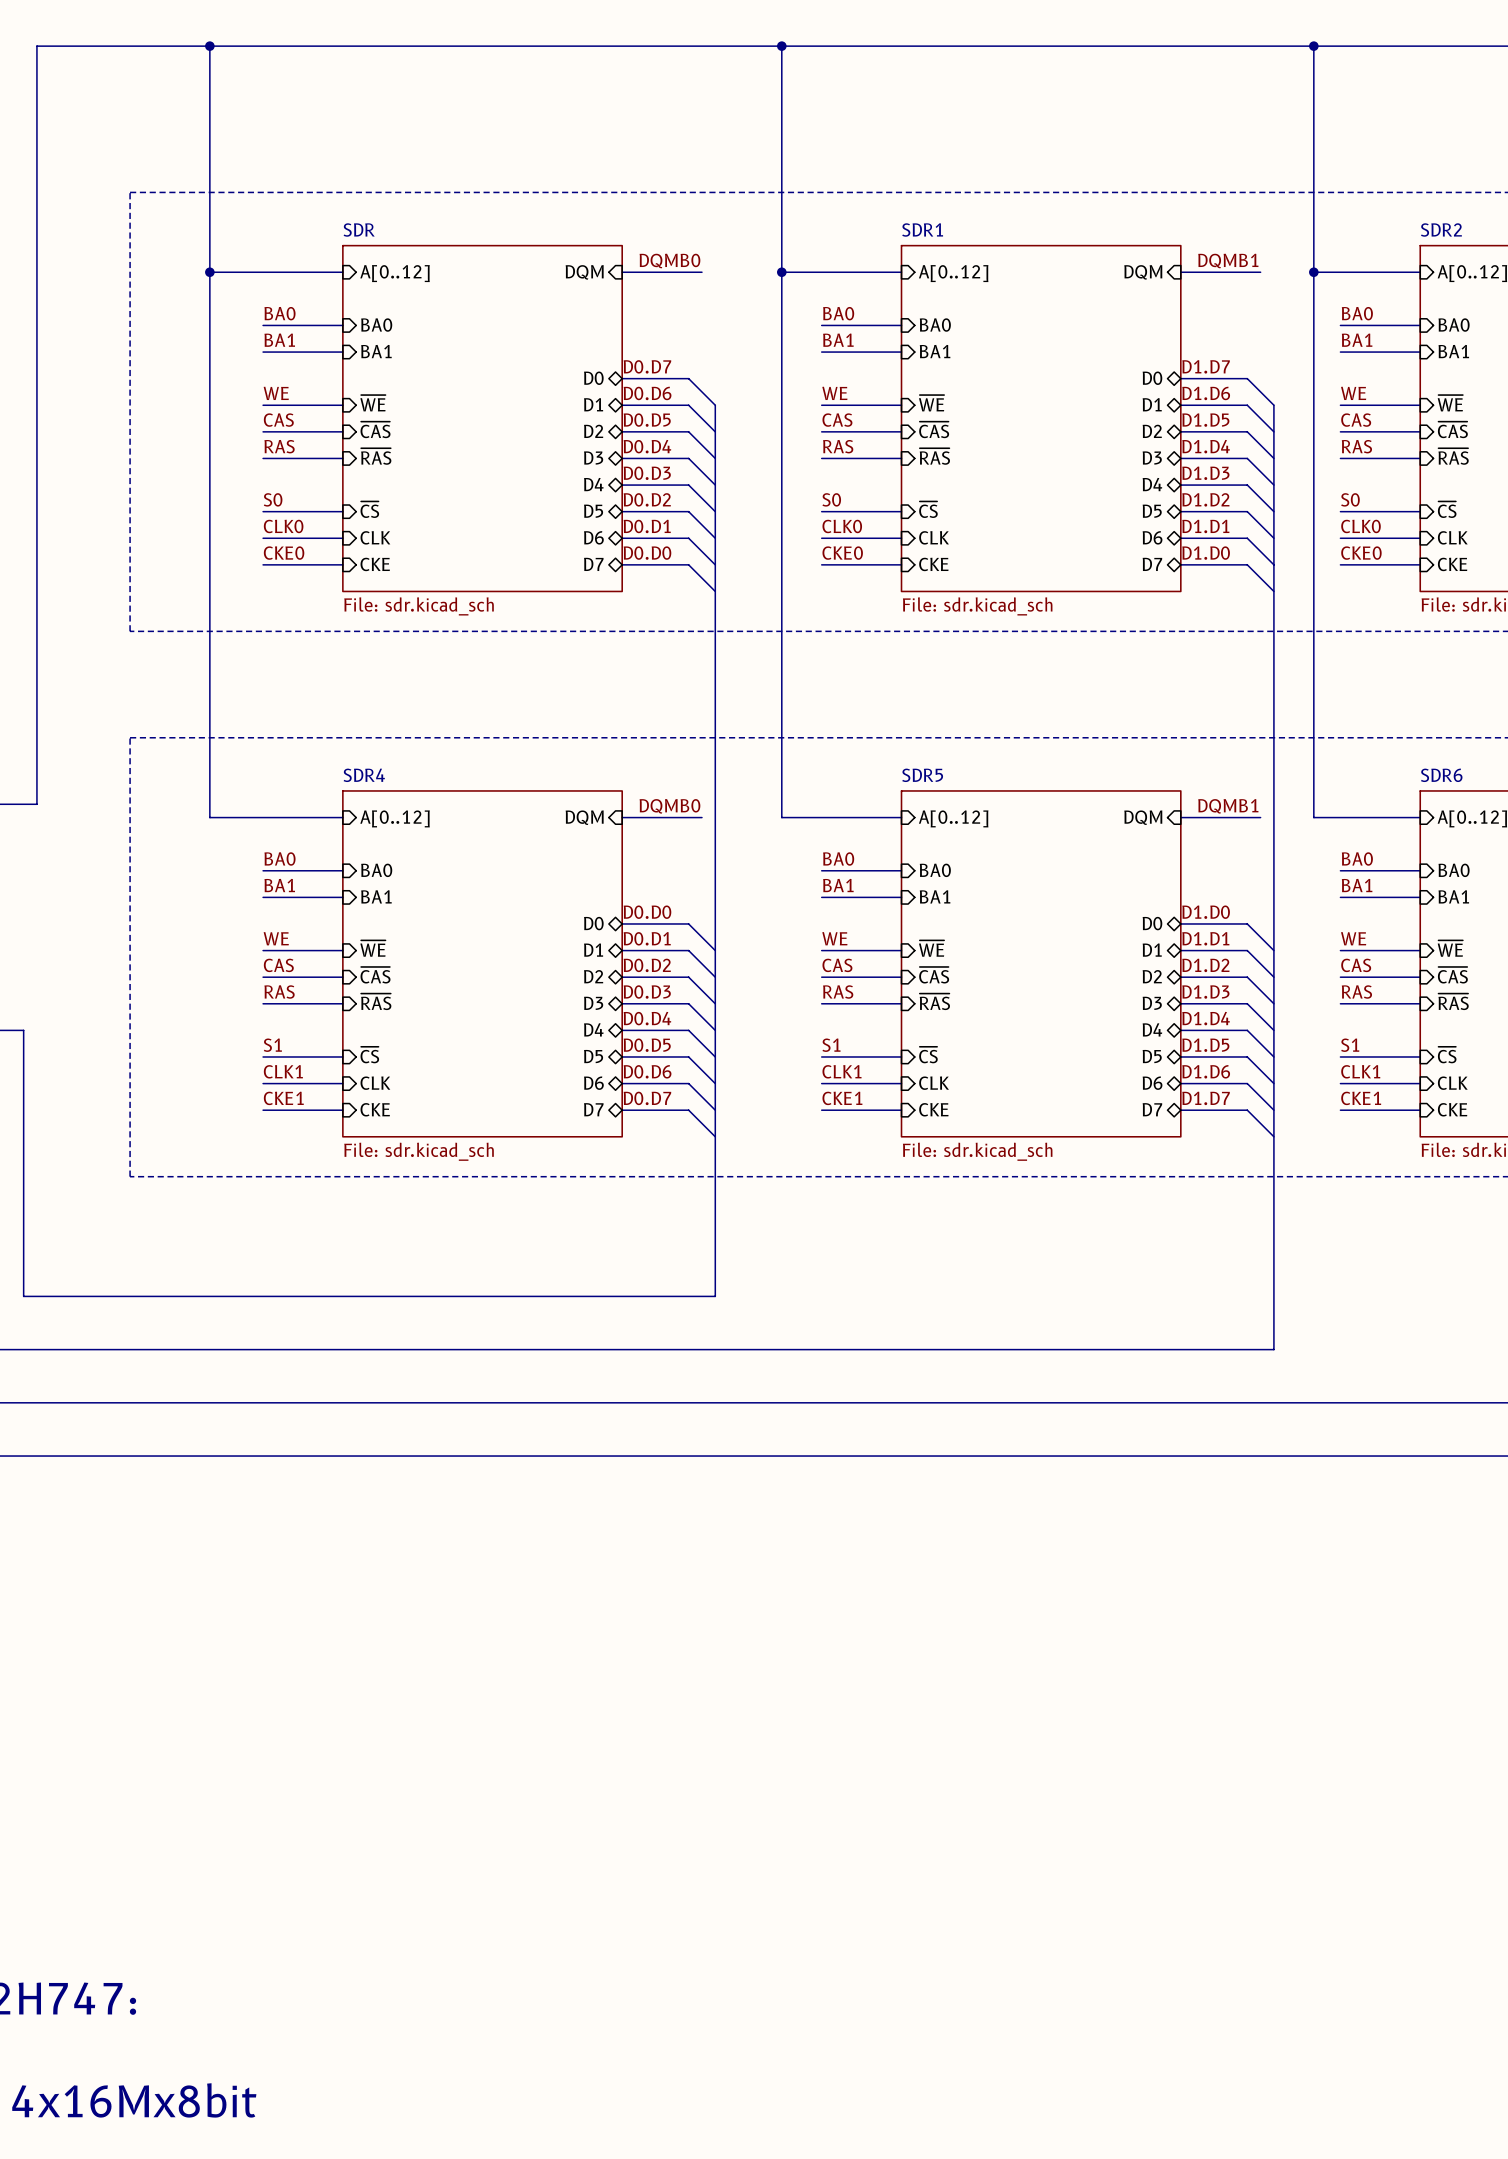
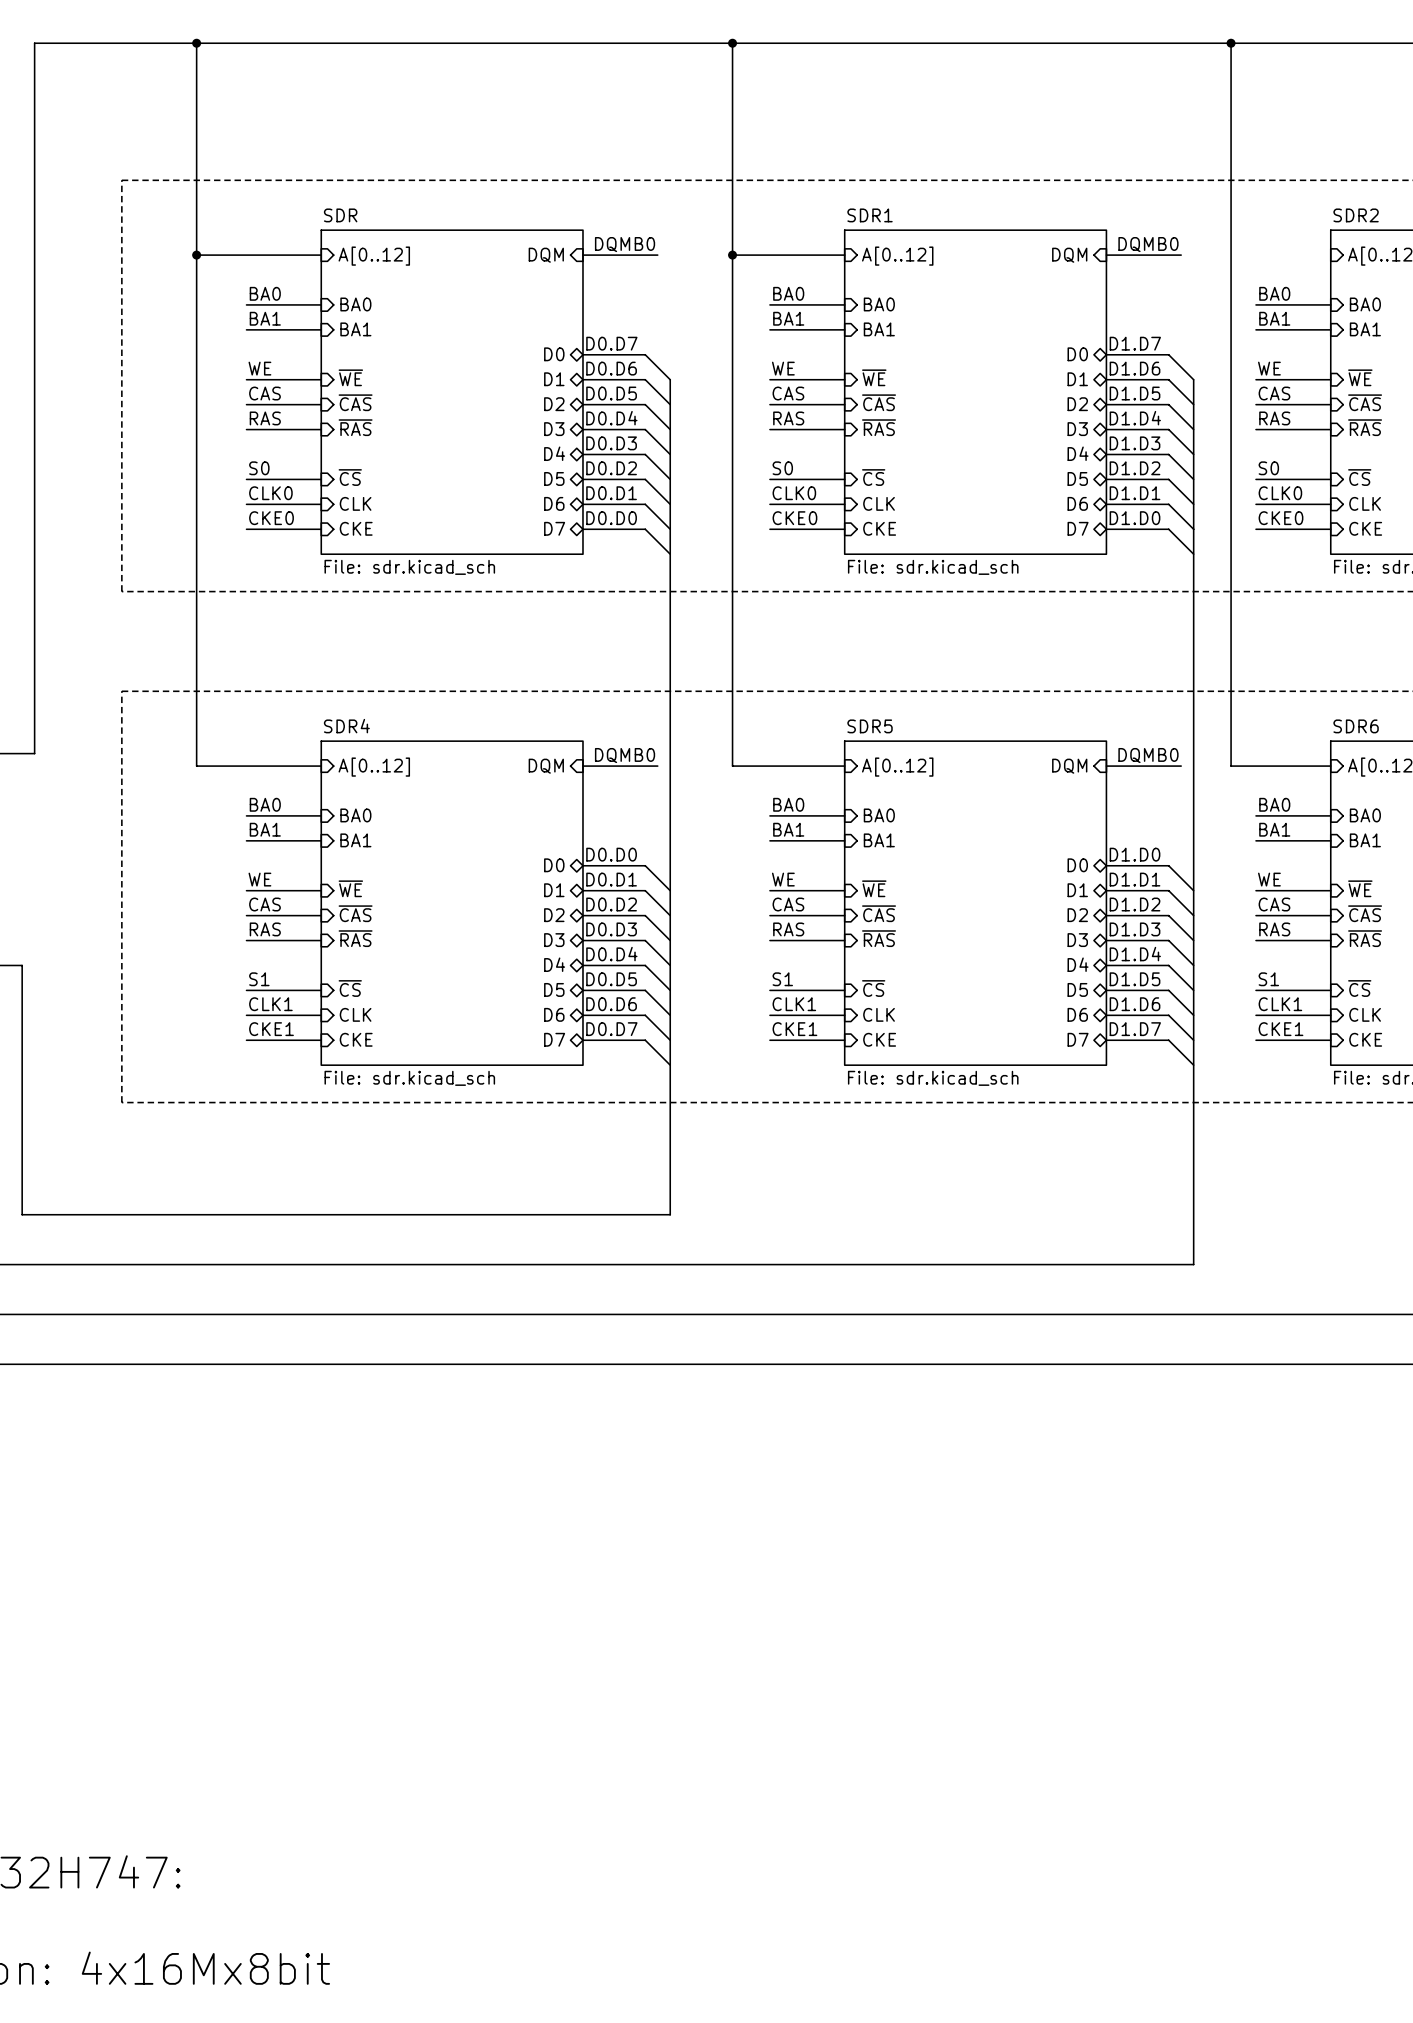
label: DQMB1 (1228, 261) -> DQMB0 (1148, 244)
bus: (1313, 272) (1420, 272) -> none
junction: (1313, 272) -> none
label: DQMB1 (1228, 806) -> DQMB0 (1148, 755)

